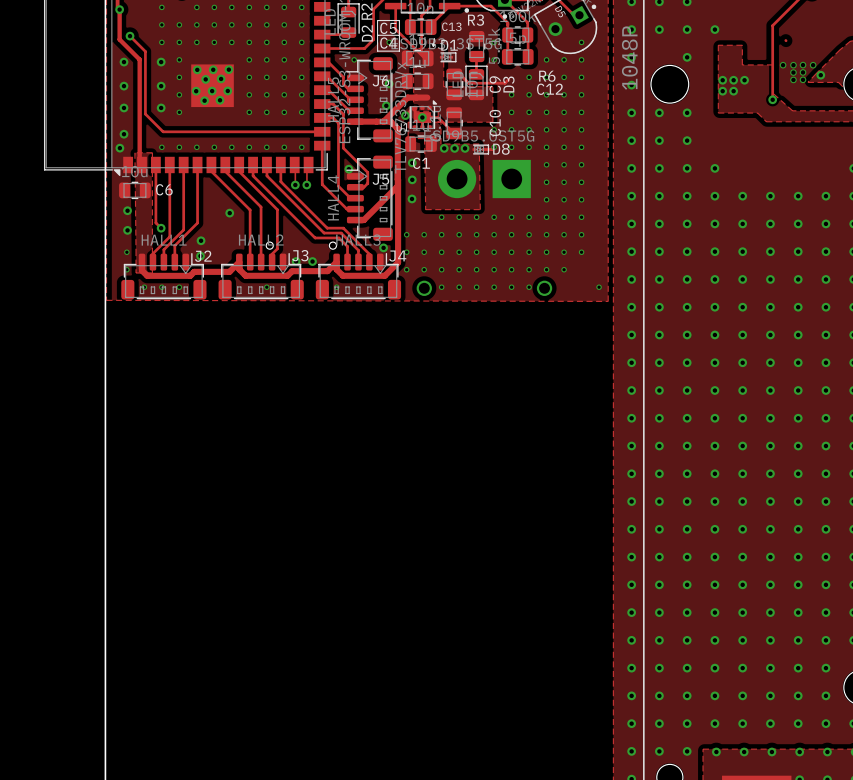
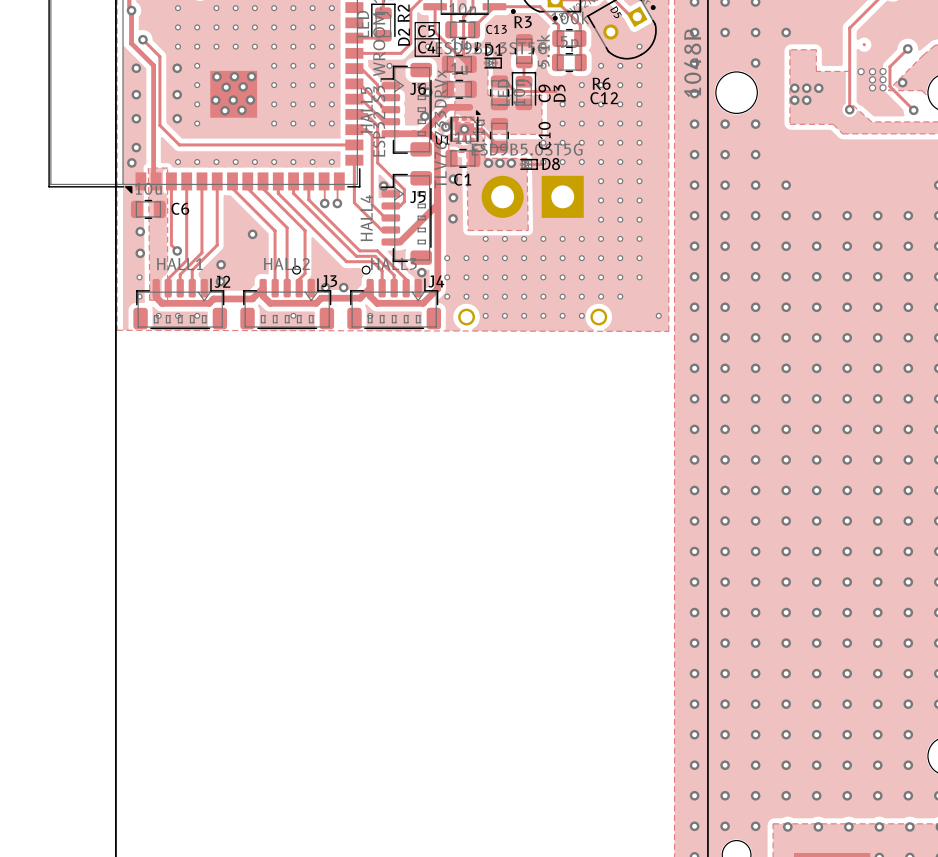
track: none -> (907, 48) (889, 66) (889, 86) (913, 110)
via: none -> (907, 48)
via: (813, 65) -> none
via: none -> (913, 110)

